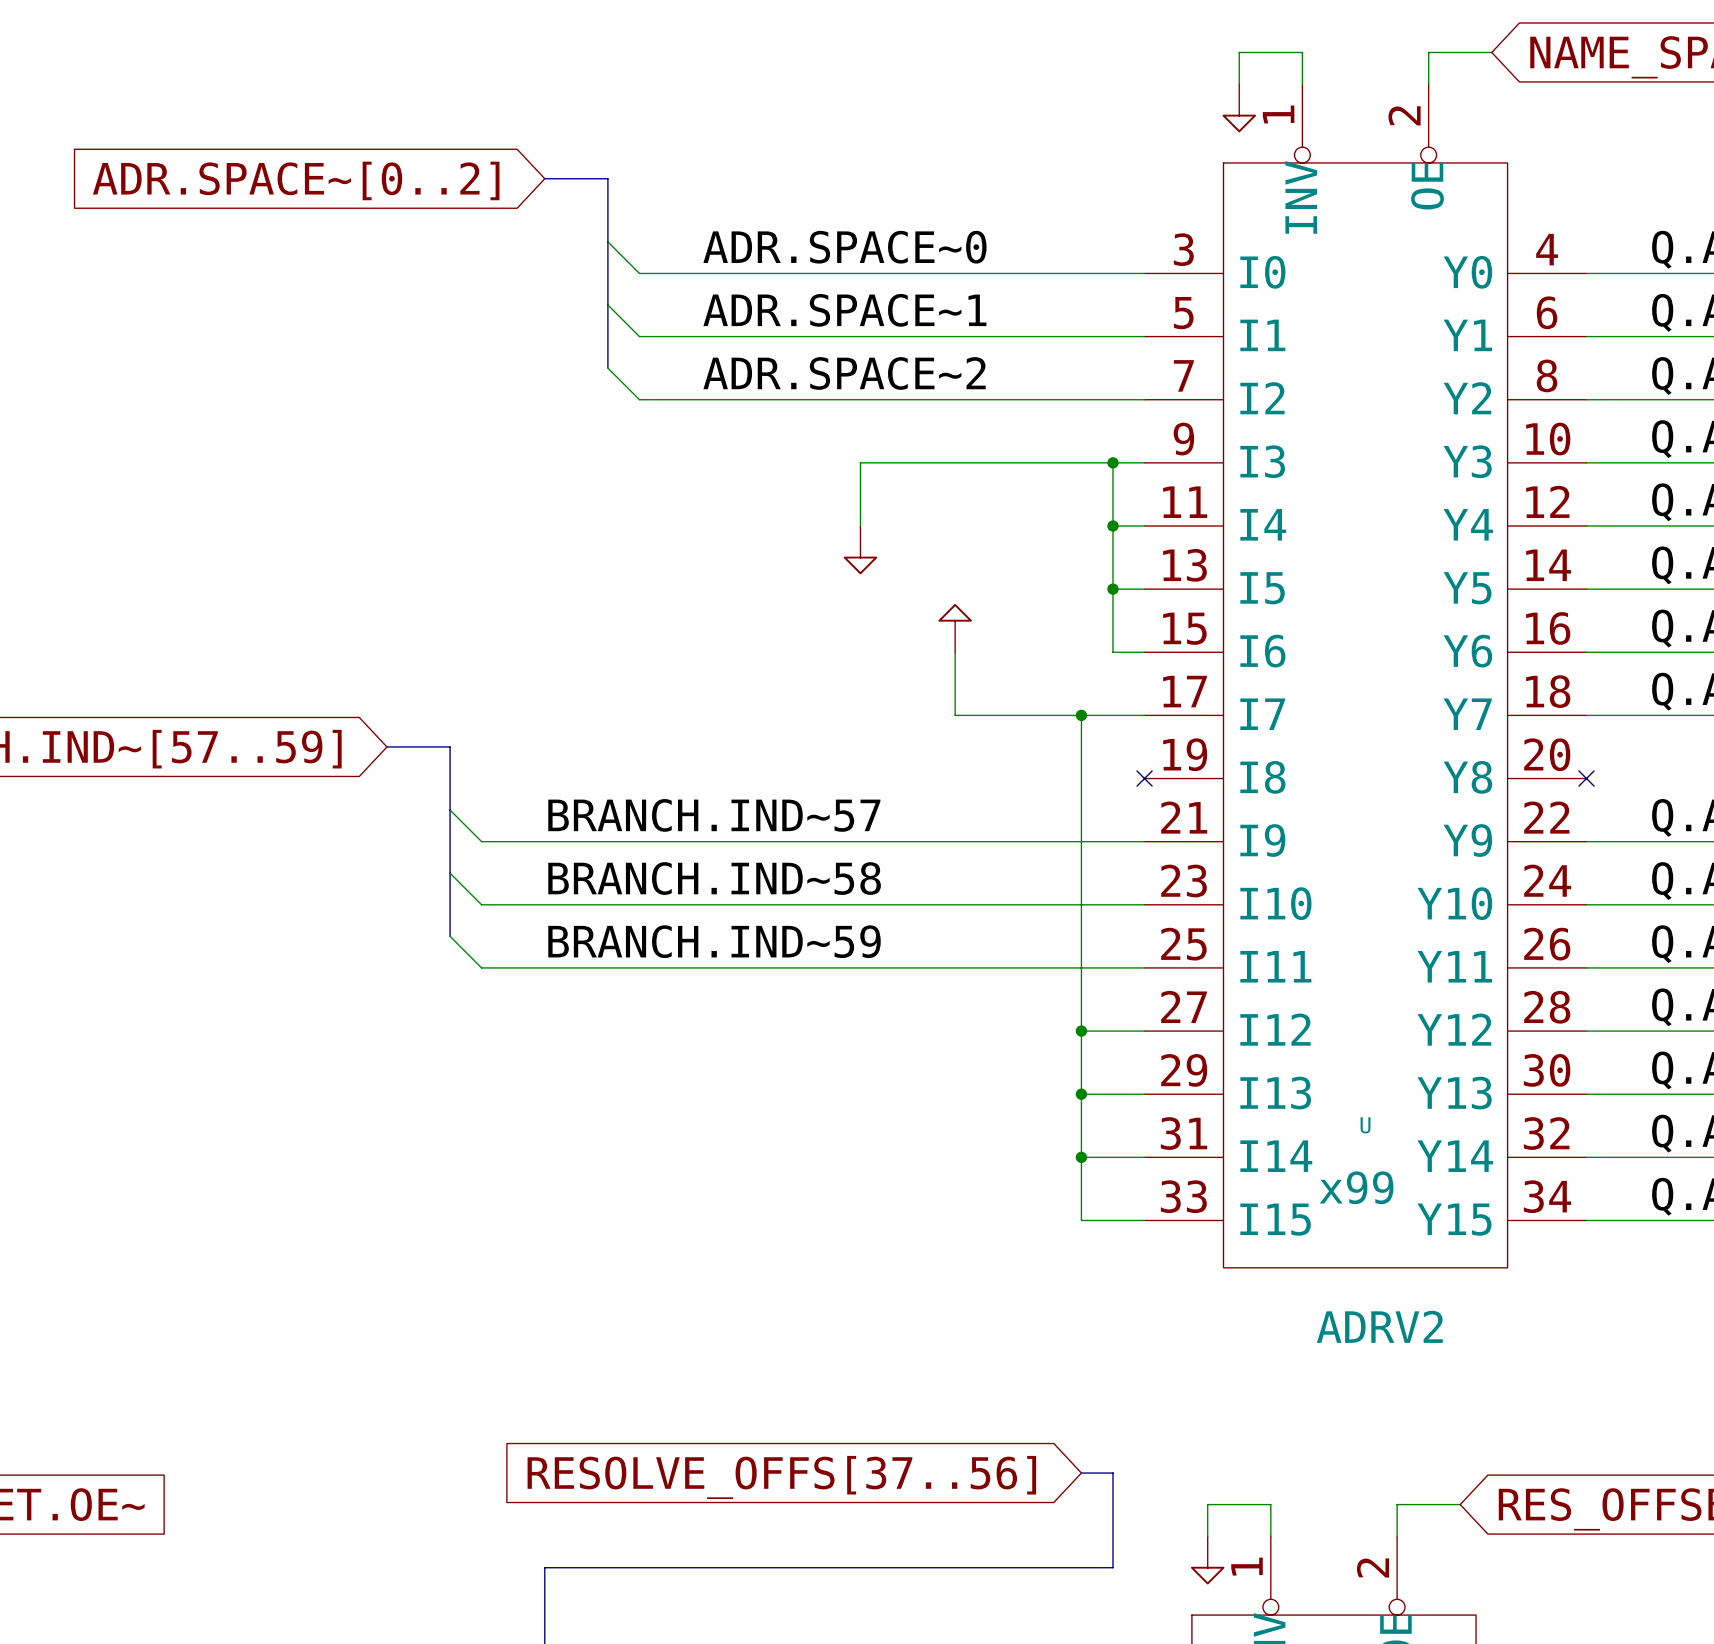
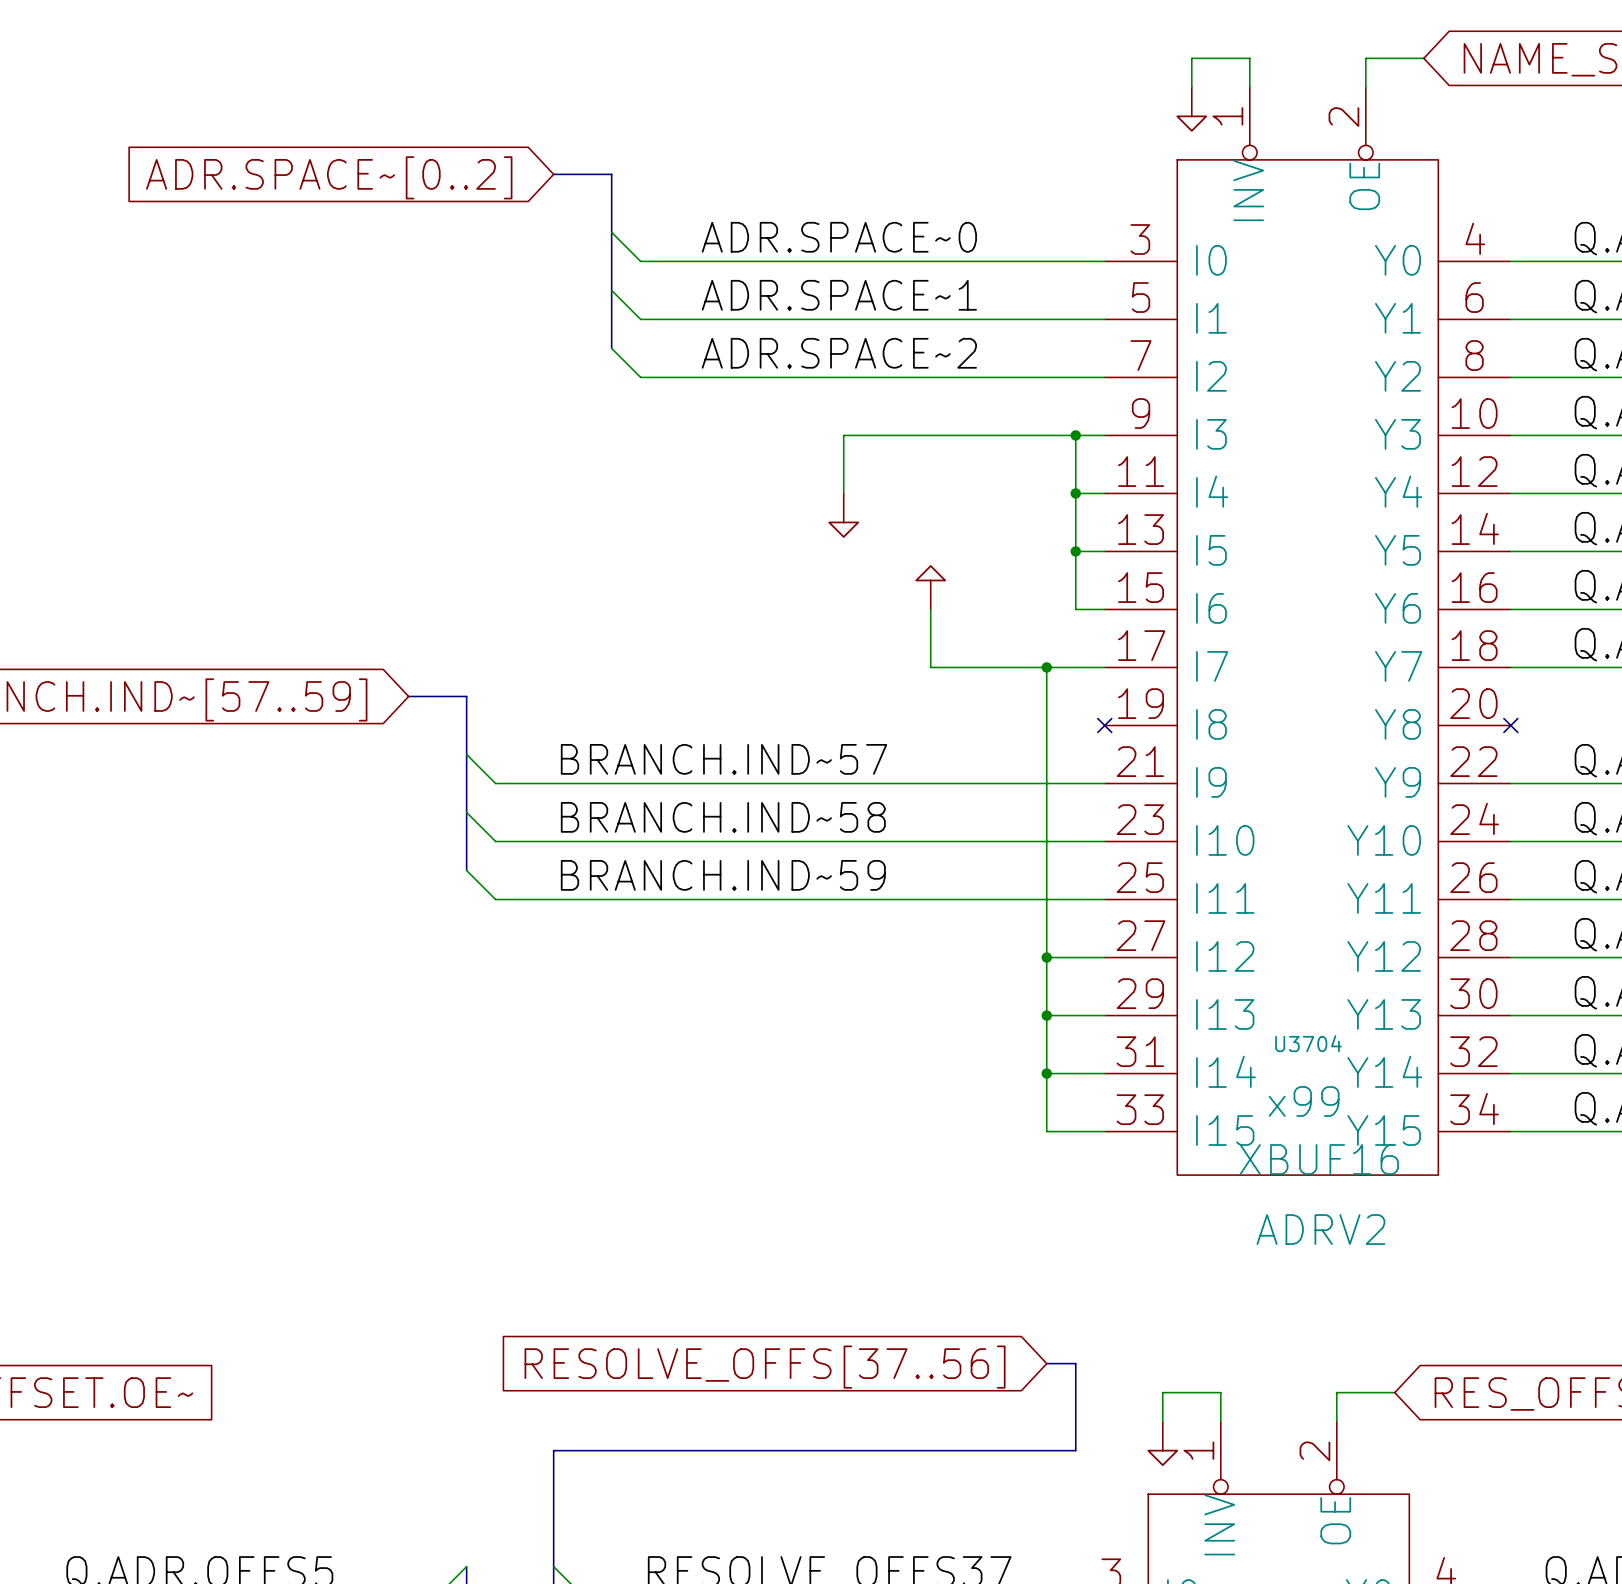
U name: U (1365, 1125) -> U3704 (1308, 1043)
U value: none -> XBUF16 (1319, 1159)

